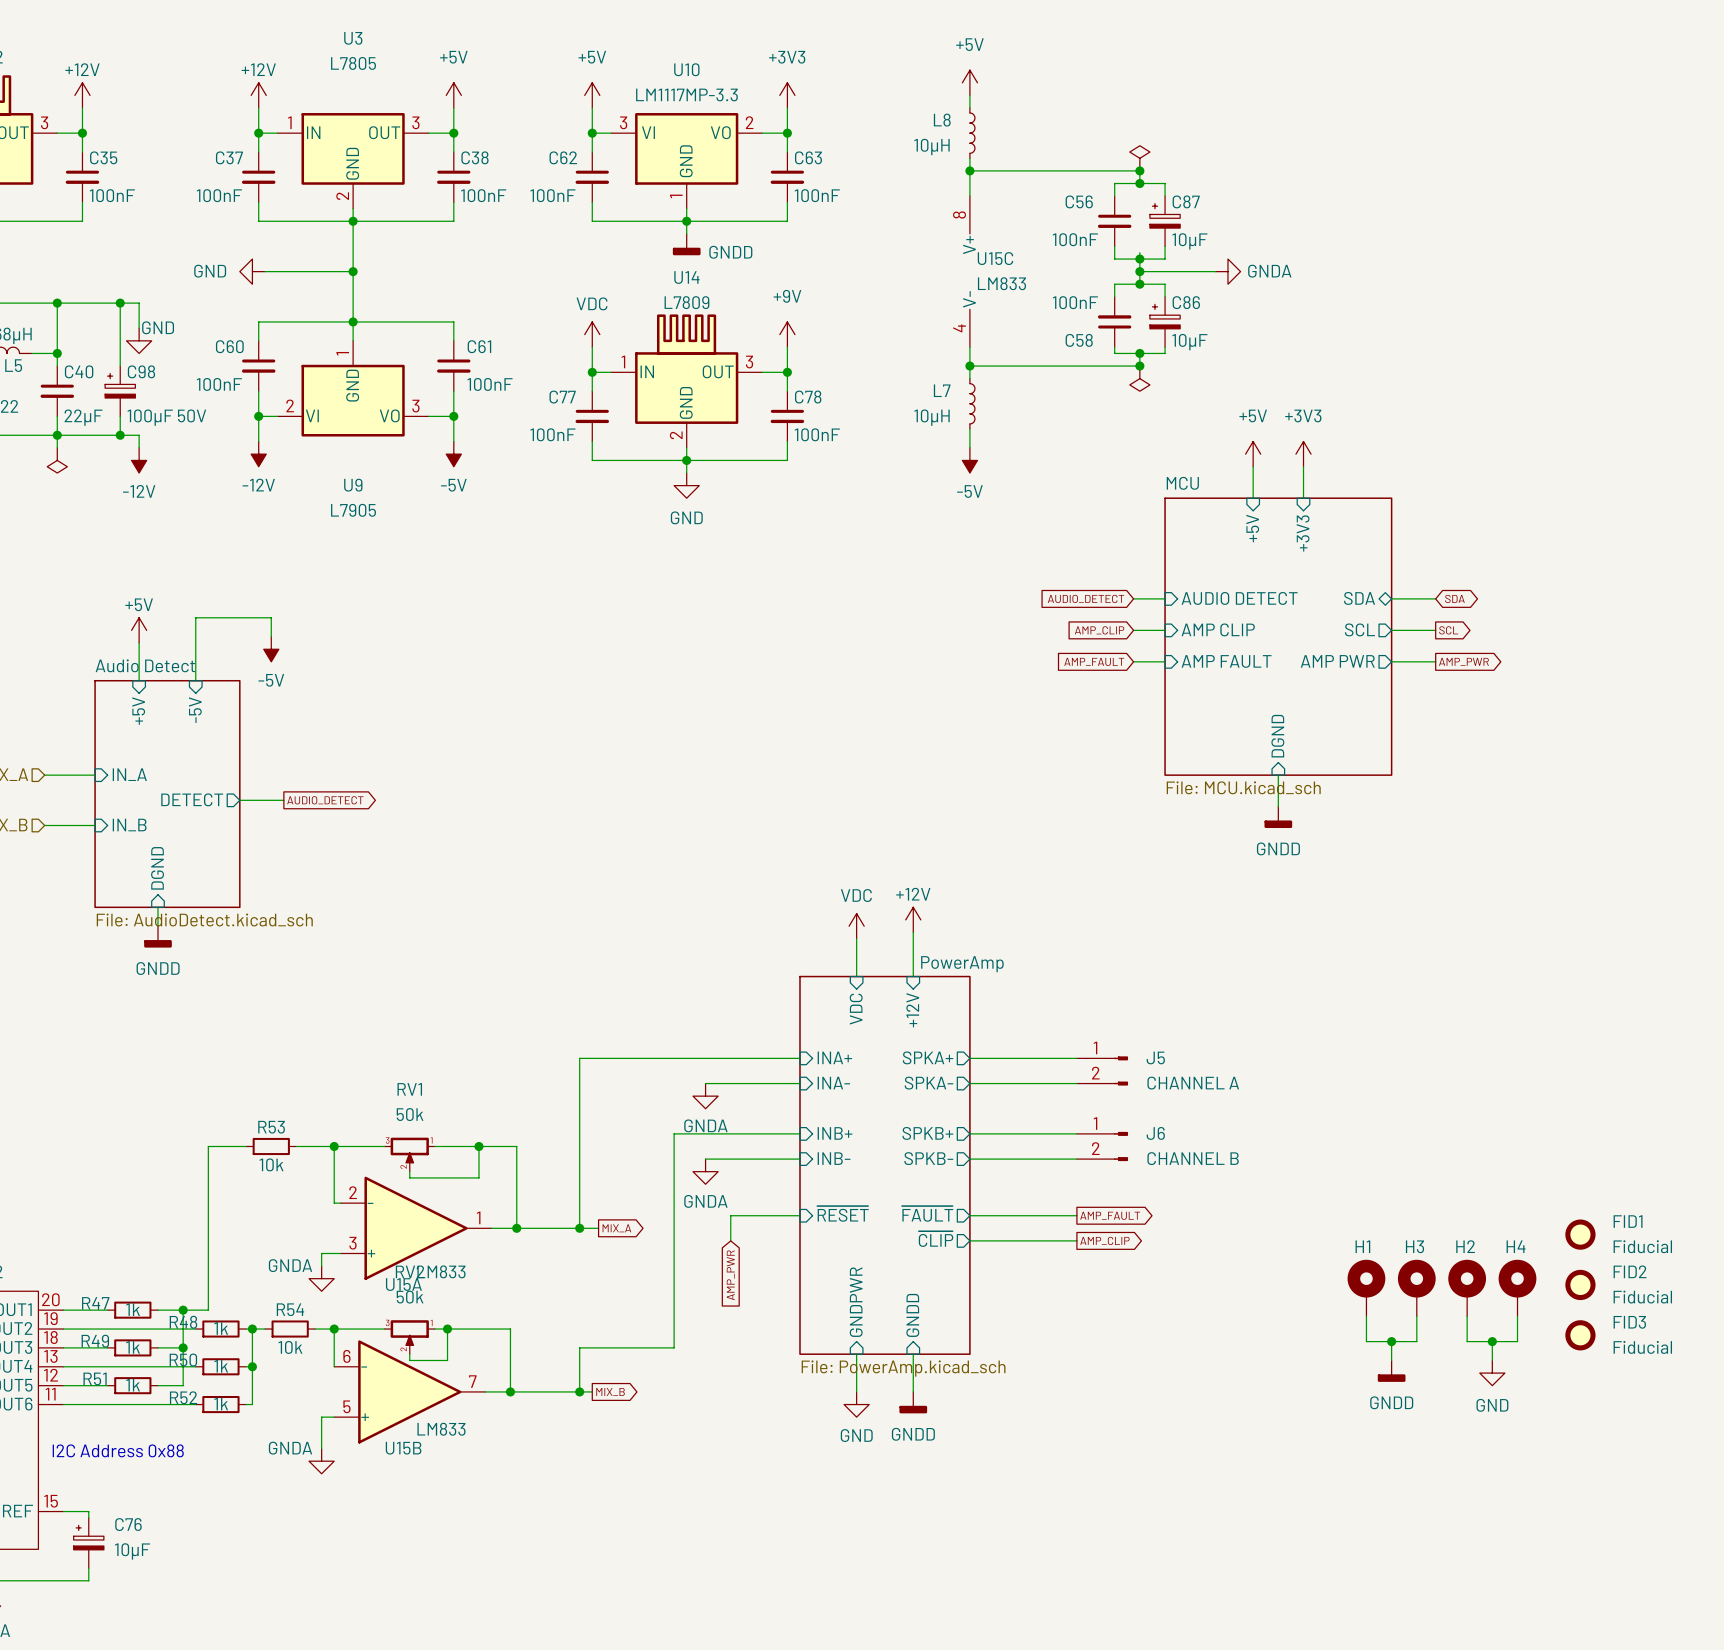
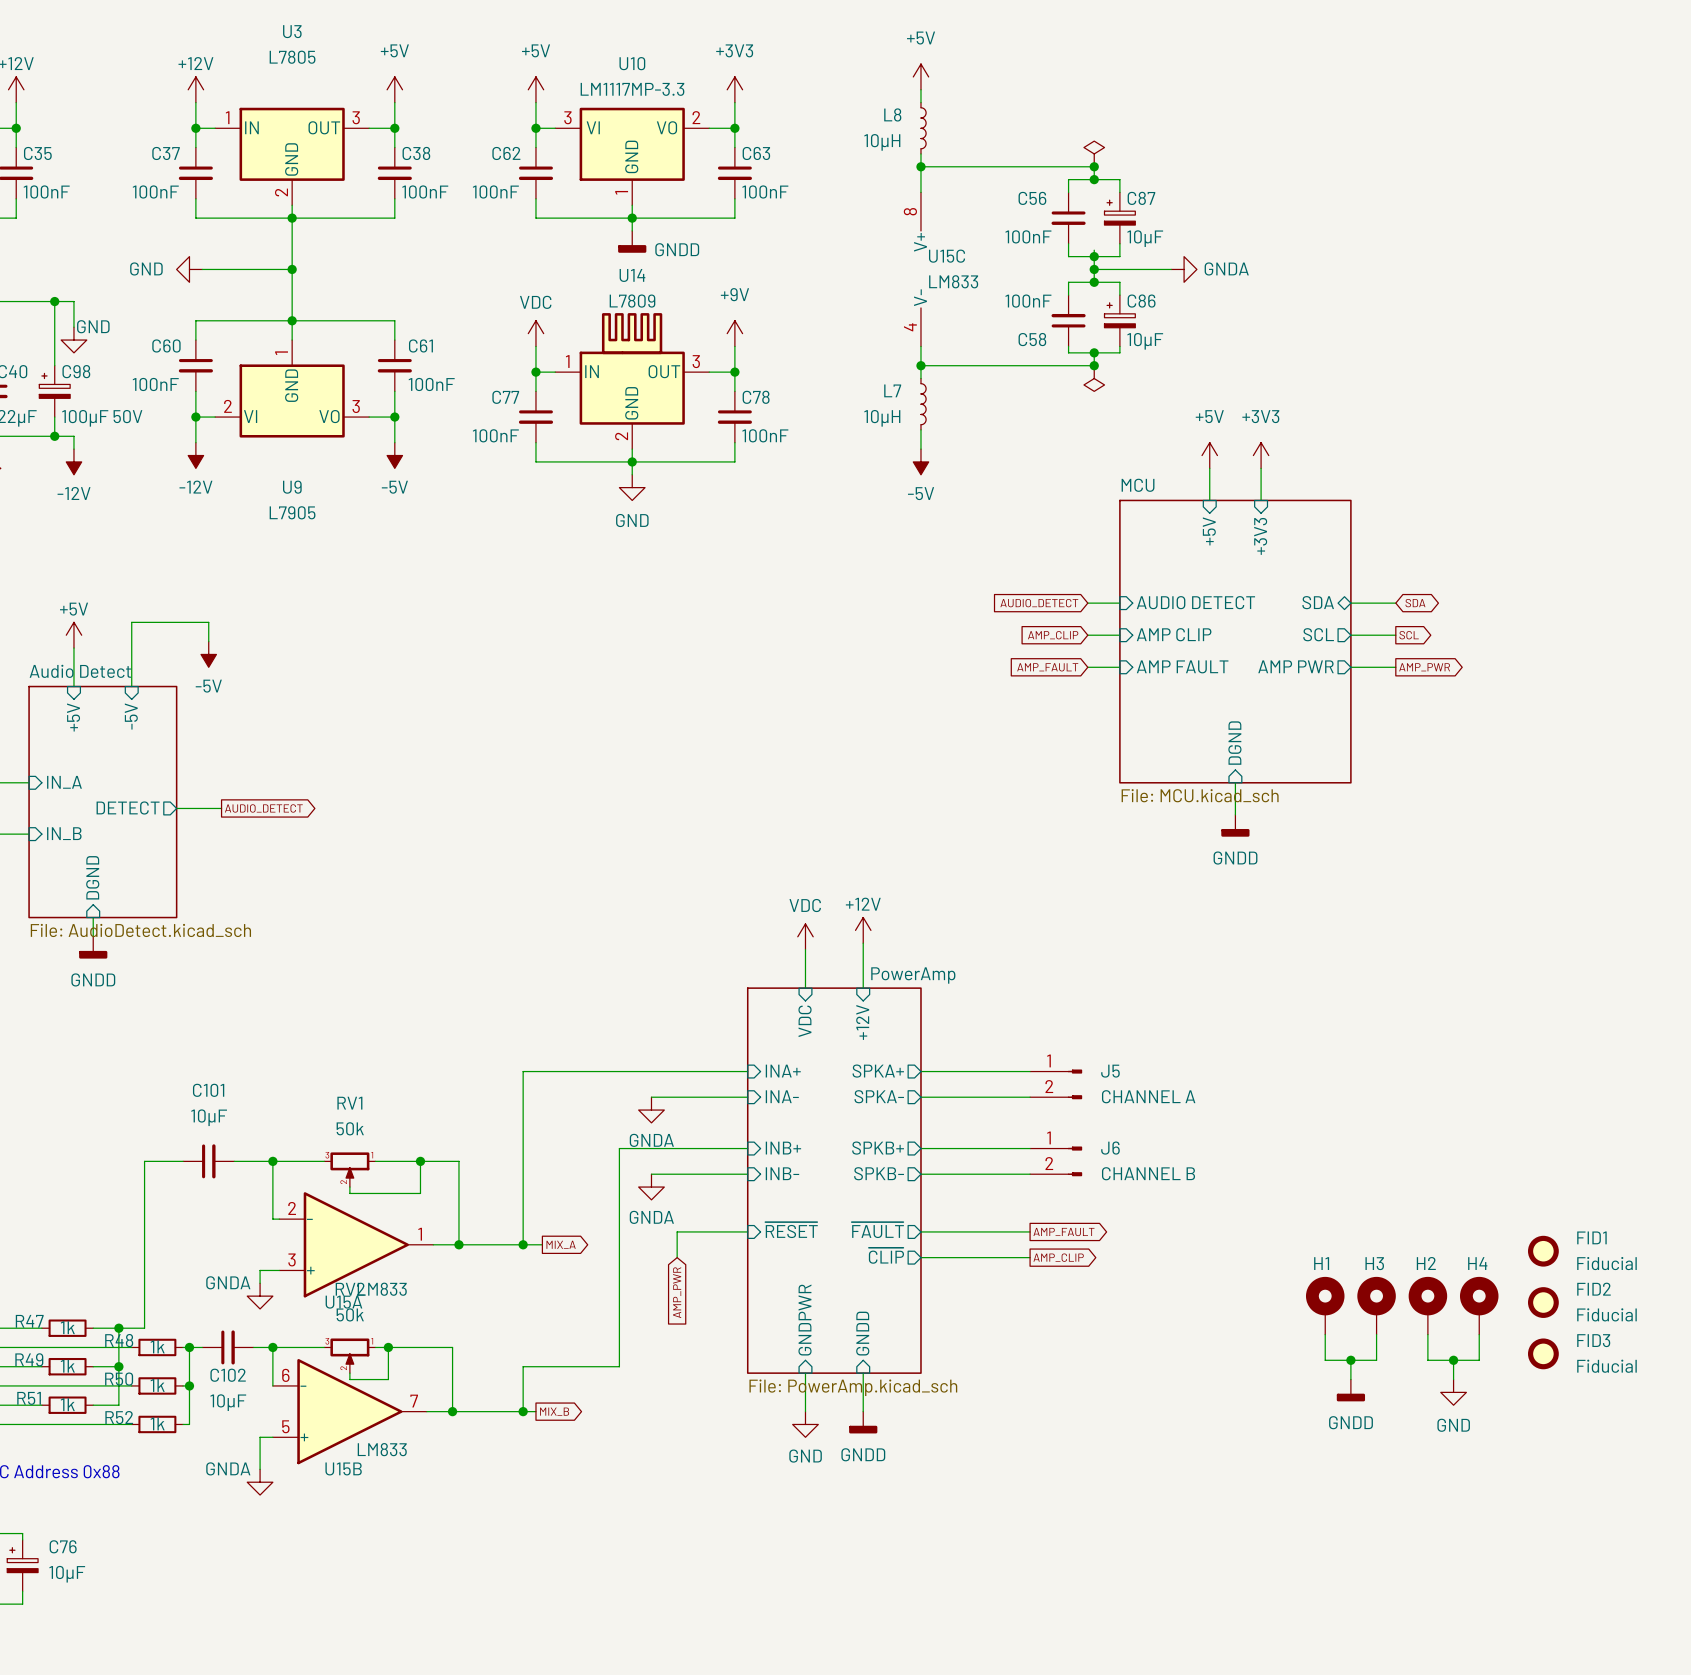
R53: 10k (271, 1146) -> none
C101: none -> 10µF (208, 1161)
R54: 10k (290, 1329) -> none
C102: none -> 10µF (227, 1347)

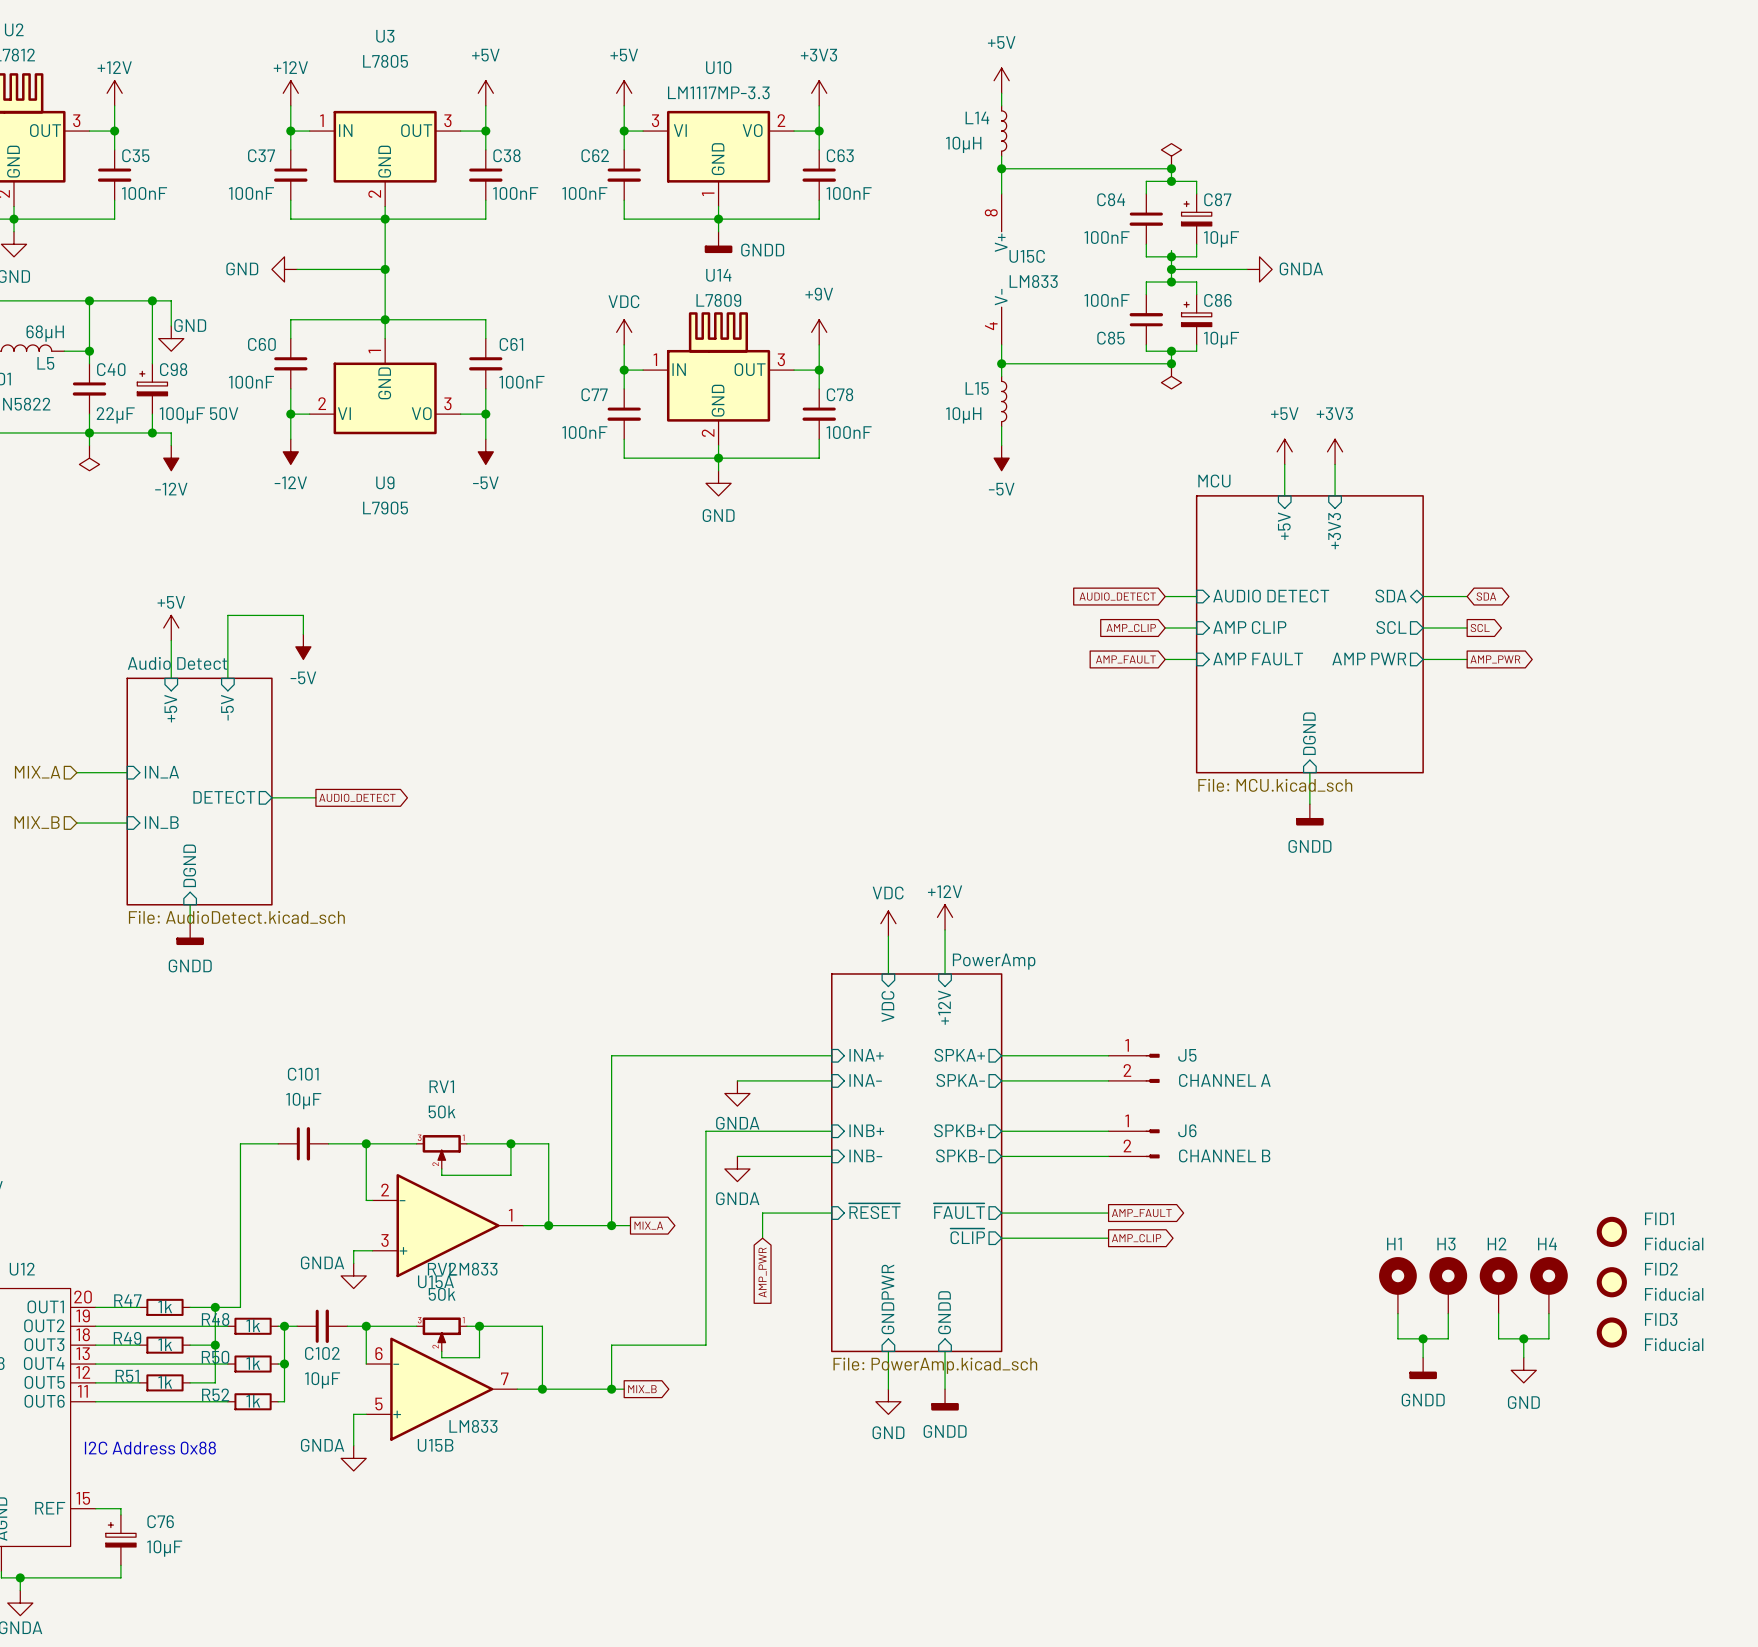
L8 name: L8 (892, 114) -> L14 (977, 117)
C56 name: C56 (1032, 198) -> C84 (1111, 199)
C58 name: C58 (1032, 339) -> C85 (1110, 338)
L7 name: L7 (892, 390) -> L15 (977, 388)

